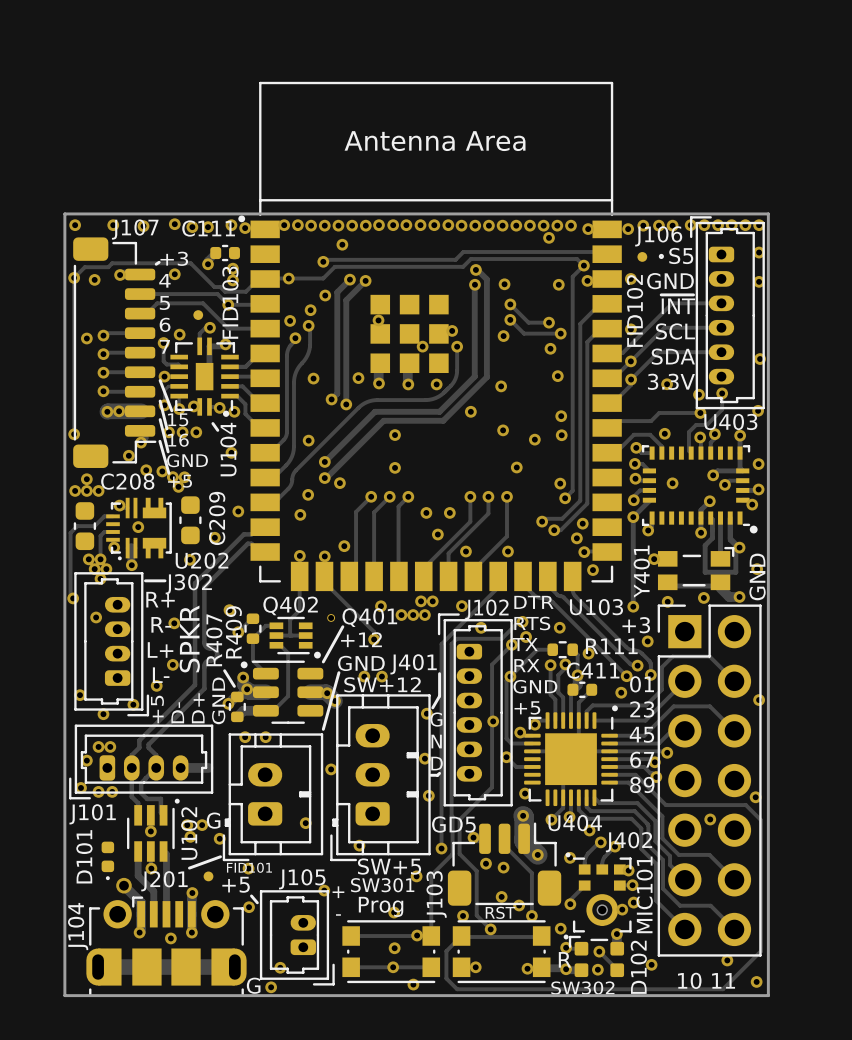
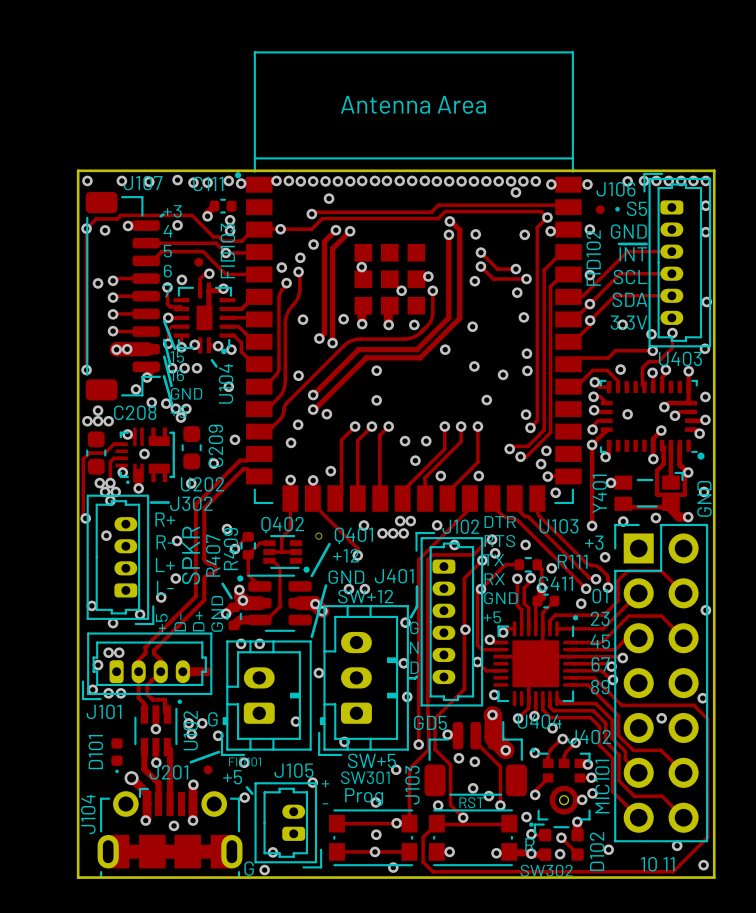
via: (643, 225) -> none
via: (658, 225) -> none

